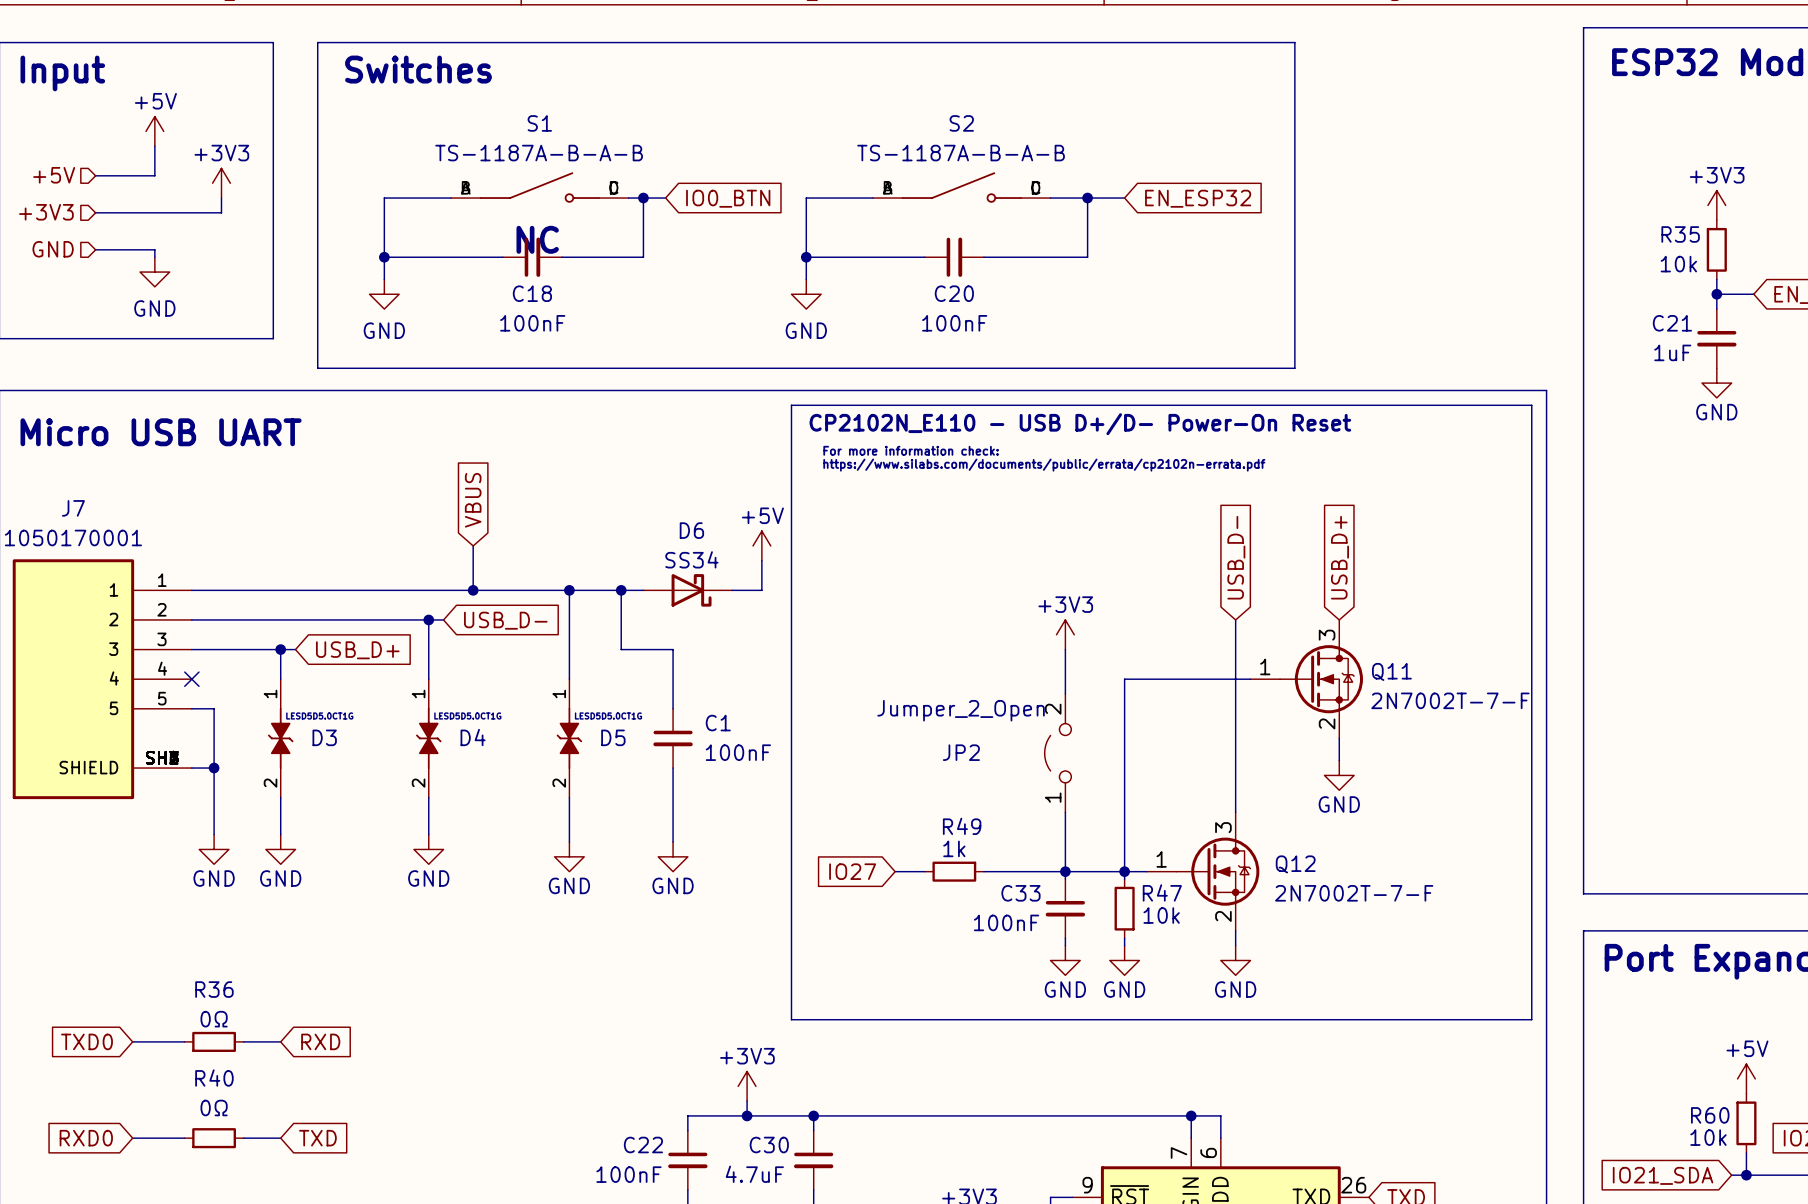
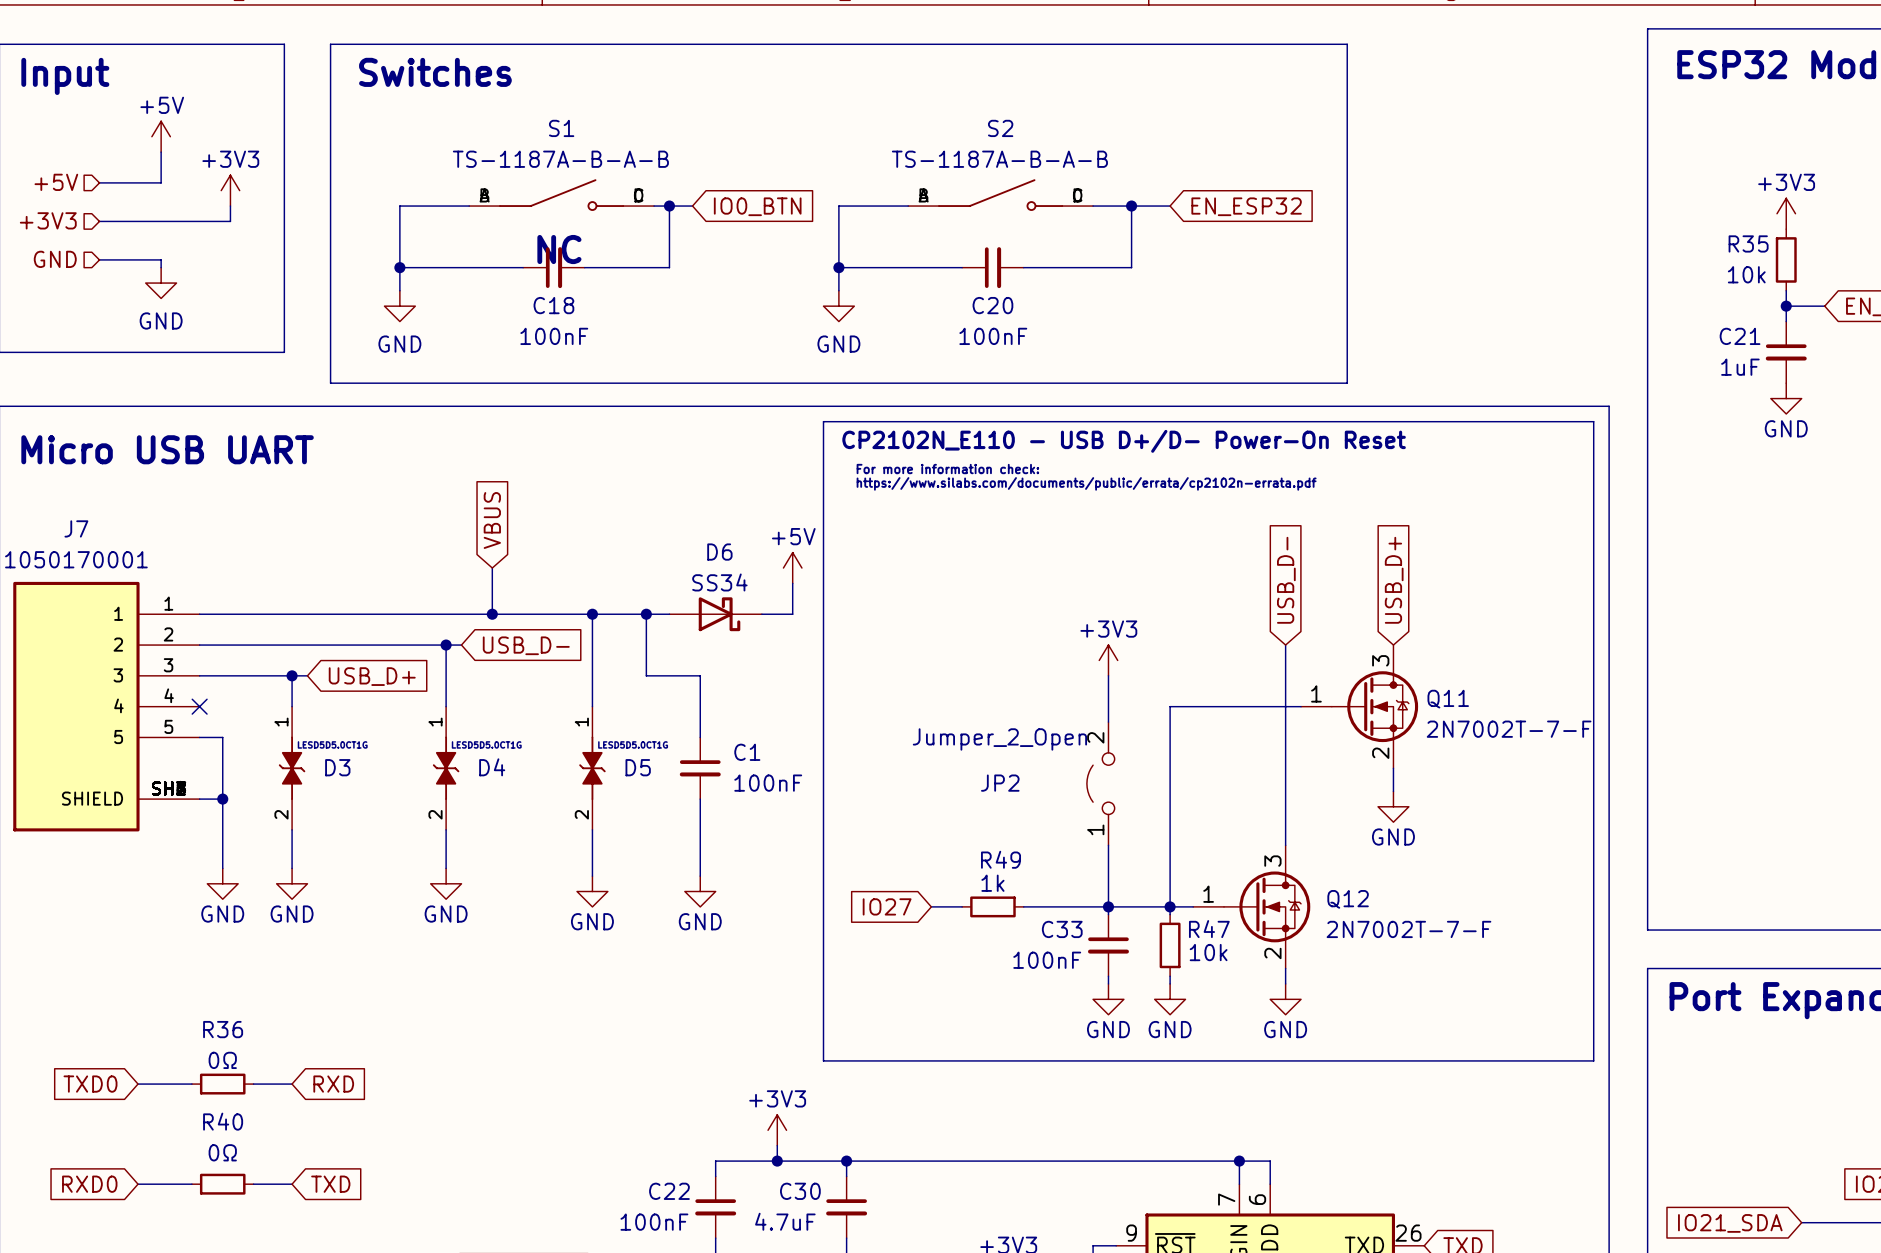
power symbol: +5V (1746, 1078) -> none
R60: 10k (1746, 1123) -> none
wire: (1746, 1152) (1746, 1175) -> none
junction: (1746, 1175) -> none

